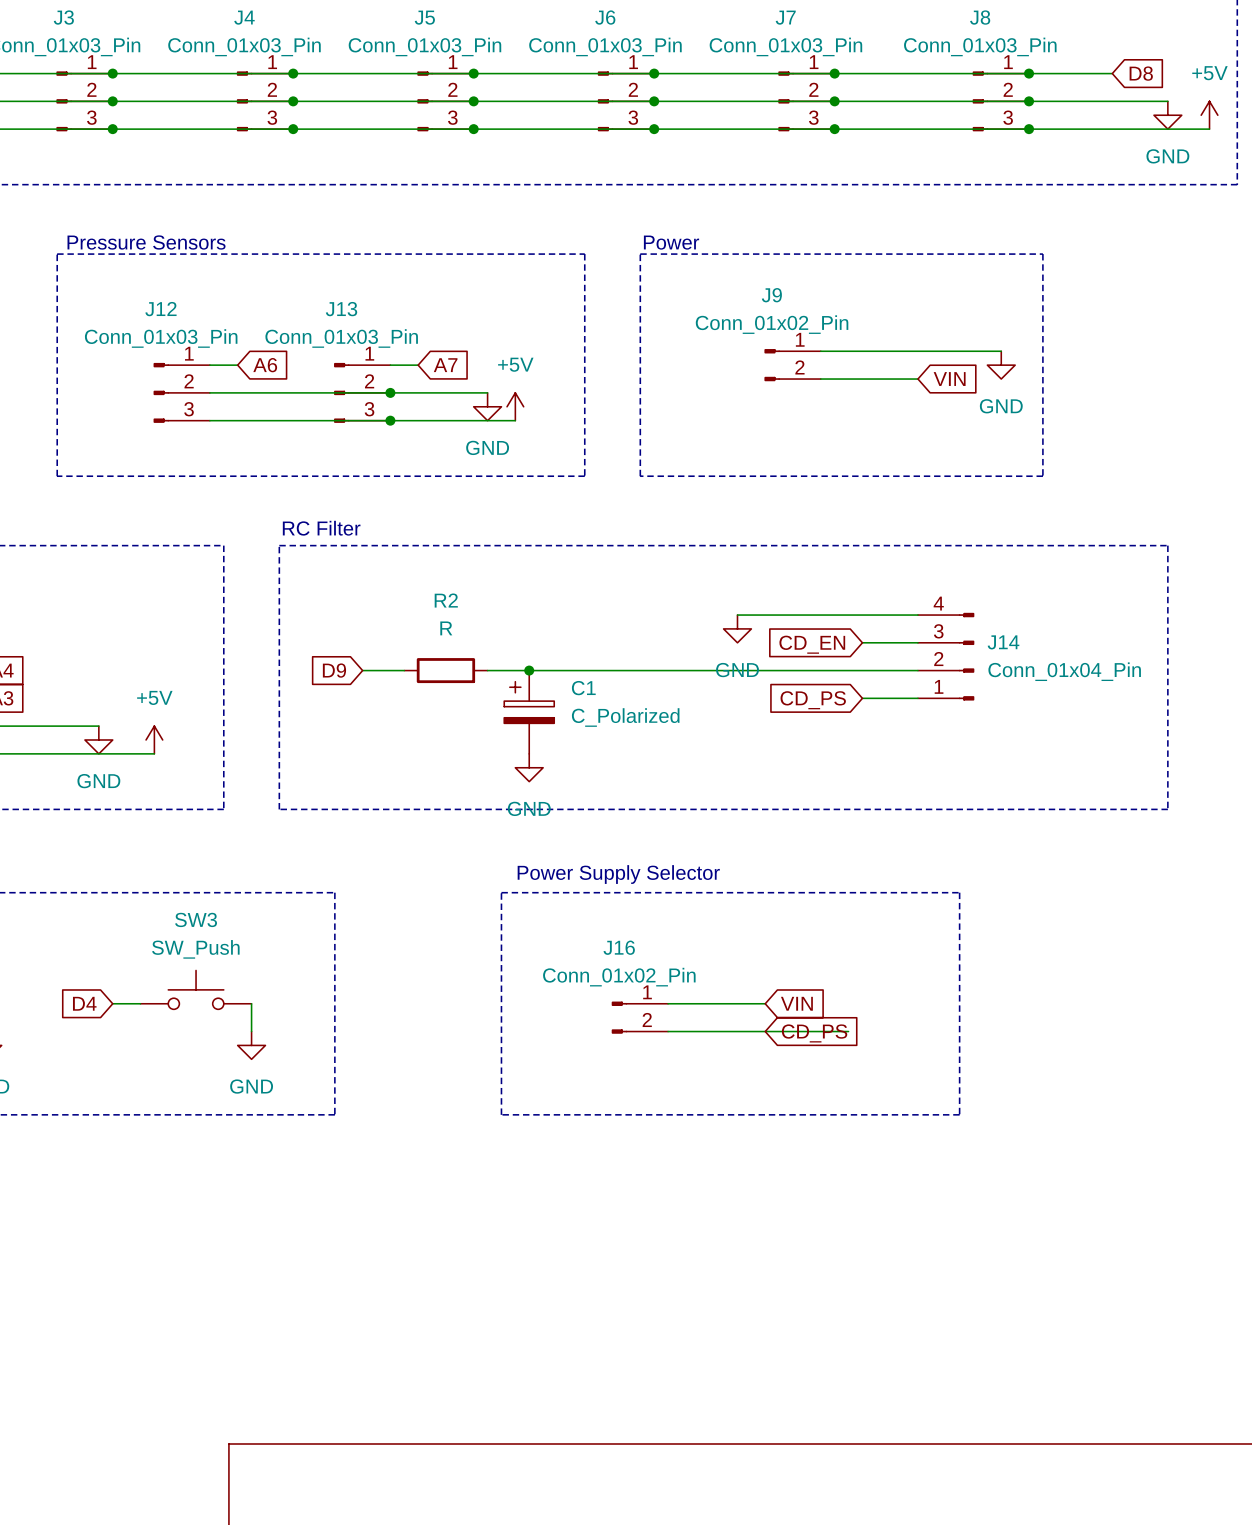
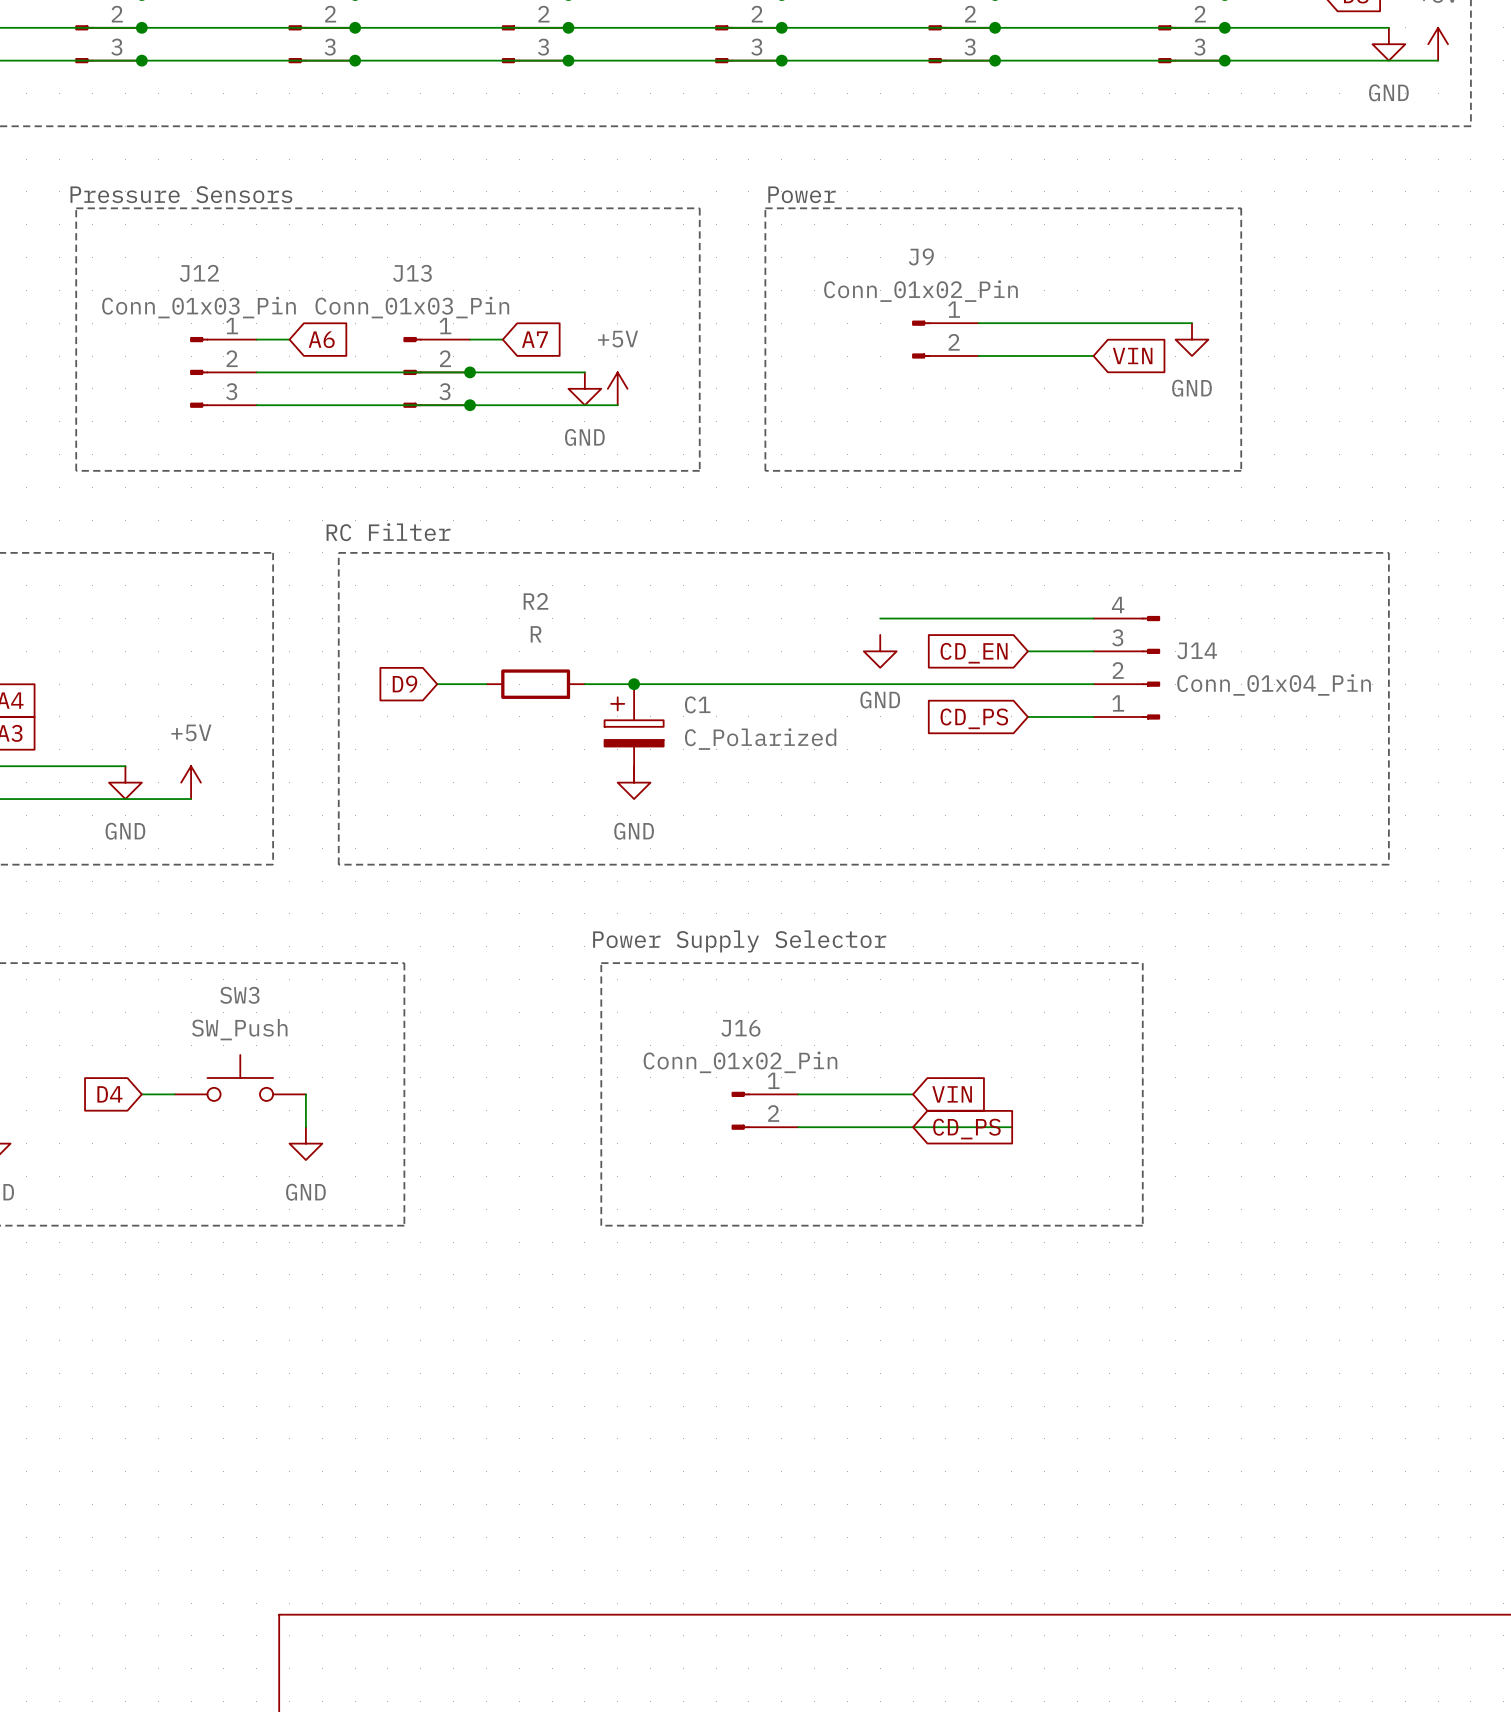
wire: (737, 615) (917, 615) -> (880, 618) (1093, 618)
wire: (862, 642) (917, 642) -> (1027, 651) (1093, 651)
global label position: CD_EN (812, 644) -> CD_EN (974, 653)
J14 position: (946, 656) -> (1126, 667)
global label position: D9 (334, 670) -> D9 (404, 684)
wire: (362, 670) (404, 670) -> (437, 684) (486, 684)
R2 position: (445, 670) -> (535, 684)
wire: (487, 670) (917, 670) -> (584, 684) (1093, 684)
junction position: (529, 670) -> (634, 684)
wire: (862, 698) (917, 698) -> (1027, 716) (1093, 716)
global label position: CD_PS (813, 700) -> CD_PS (974, 718)
C1 position: (529, 712) -> (634, 733)
power symbol position: GND (529, 767) -> GND (634, 782)

